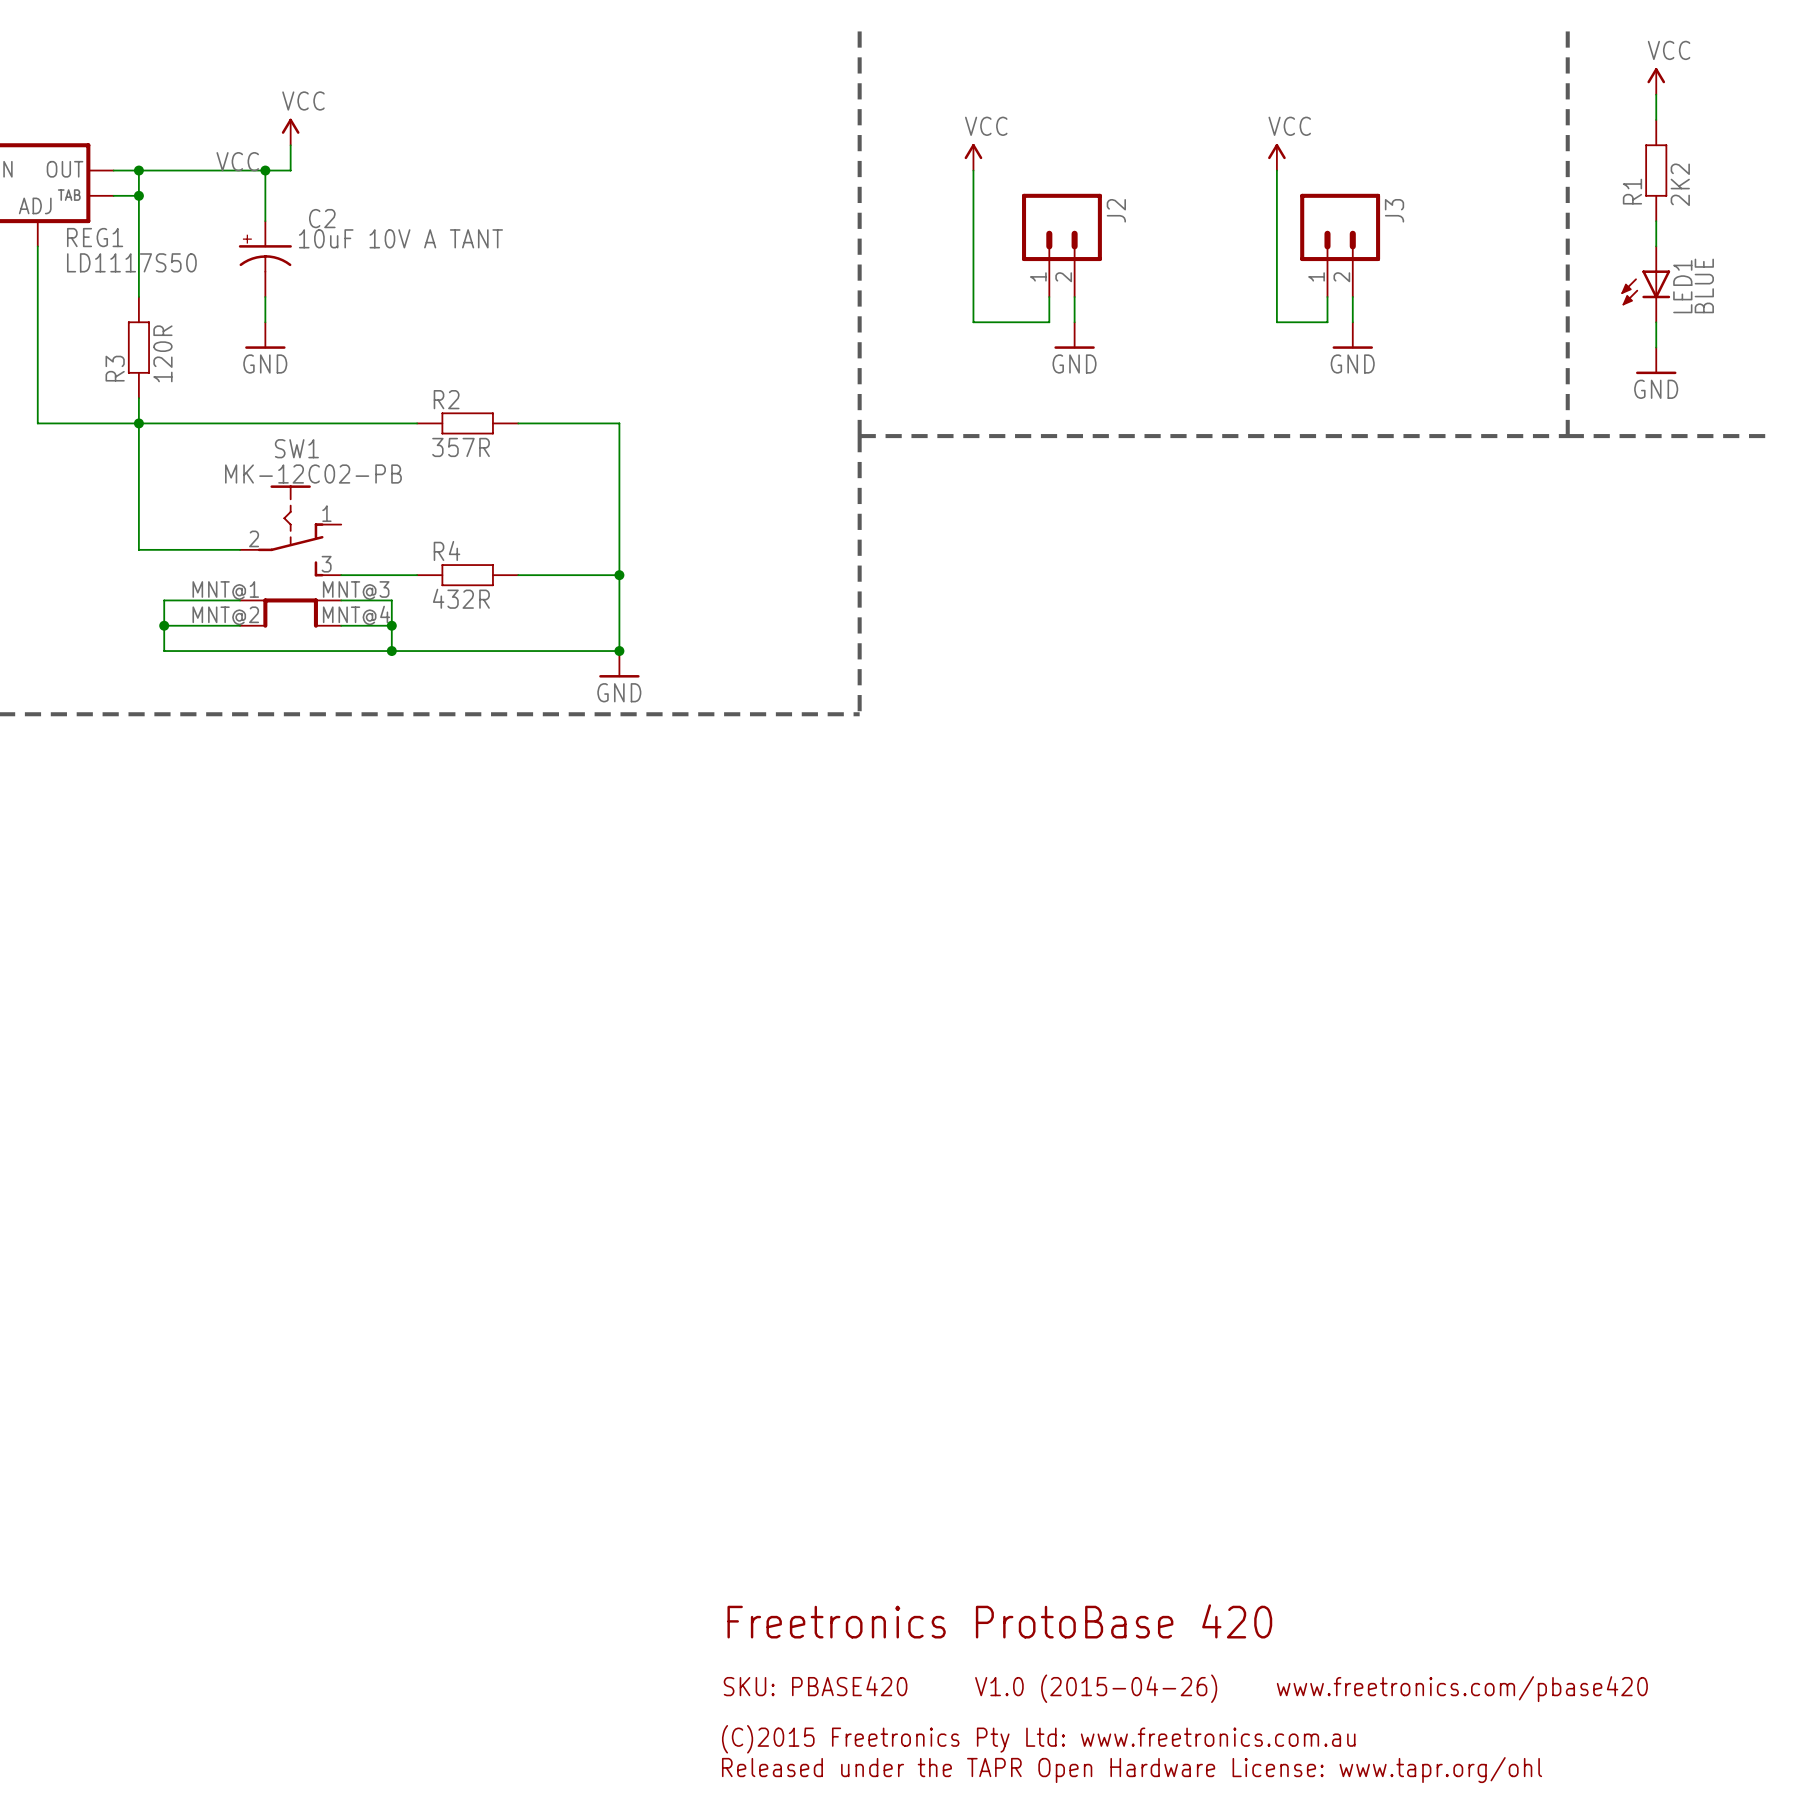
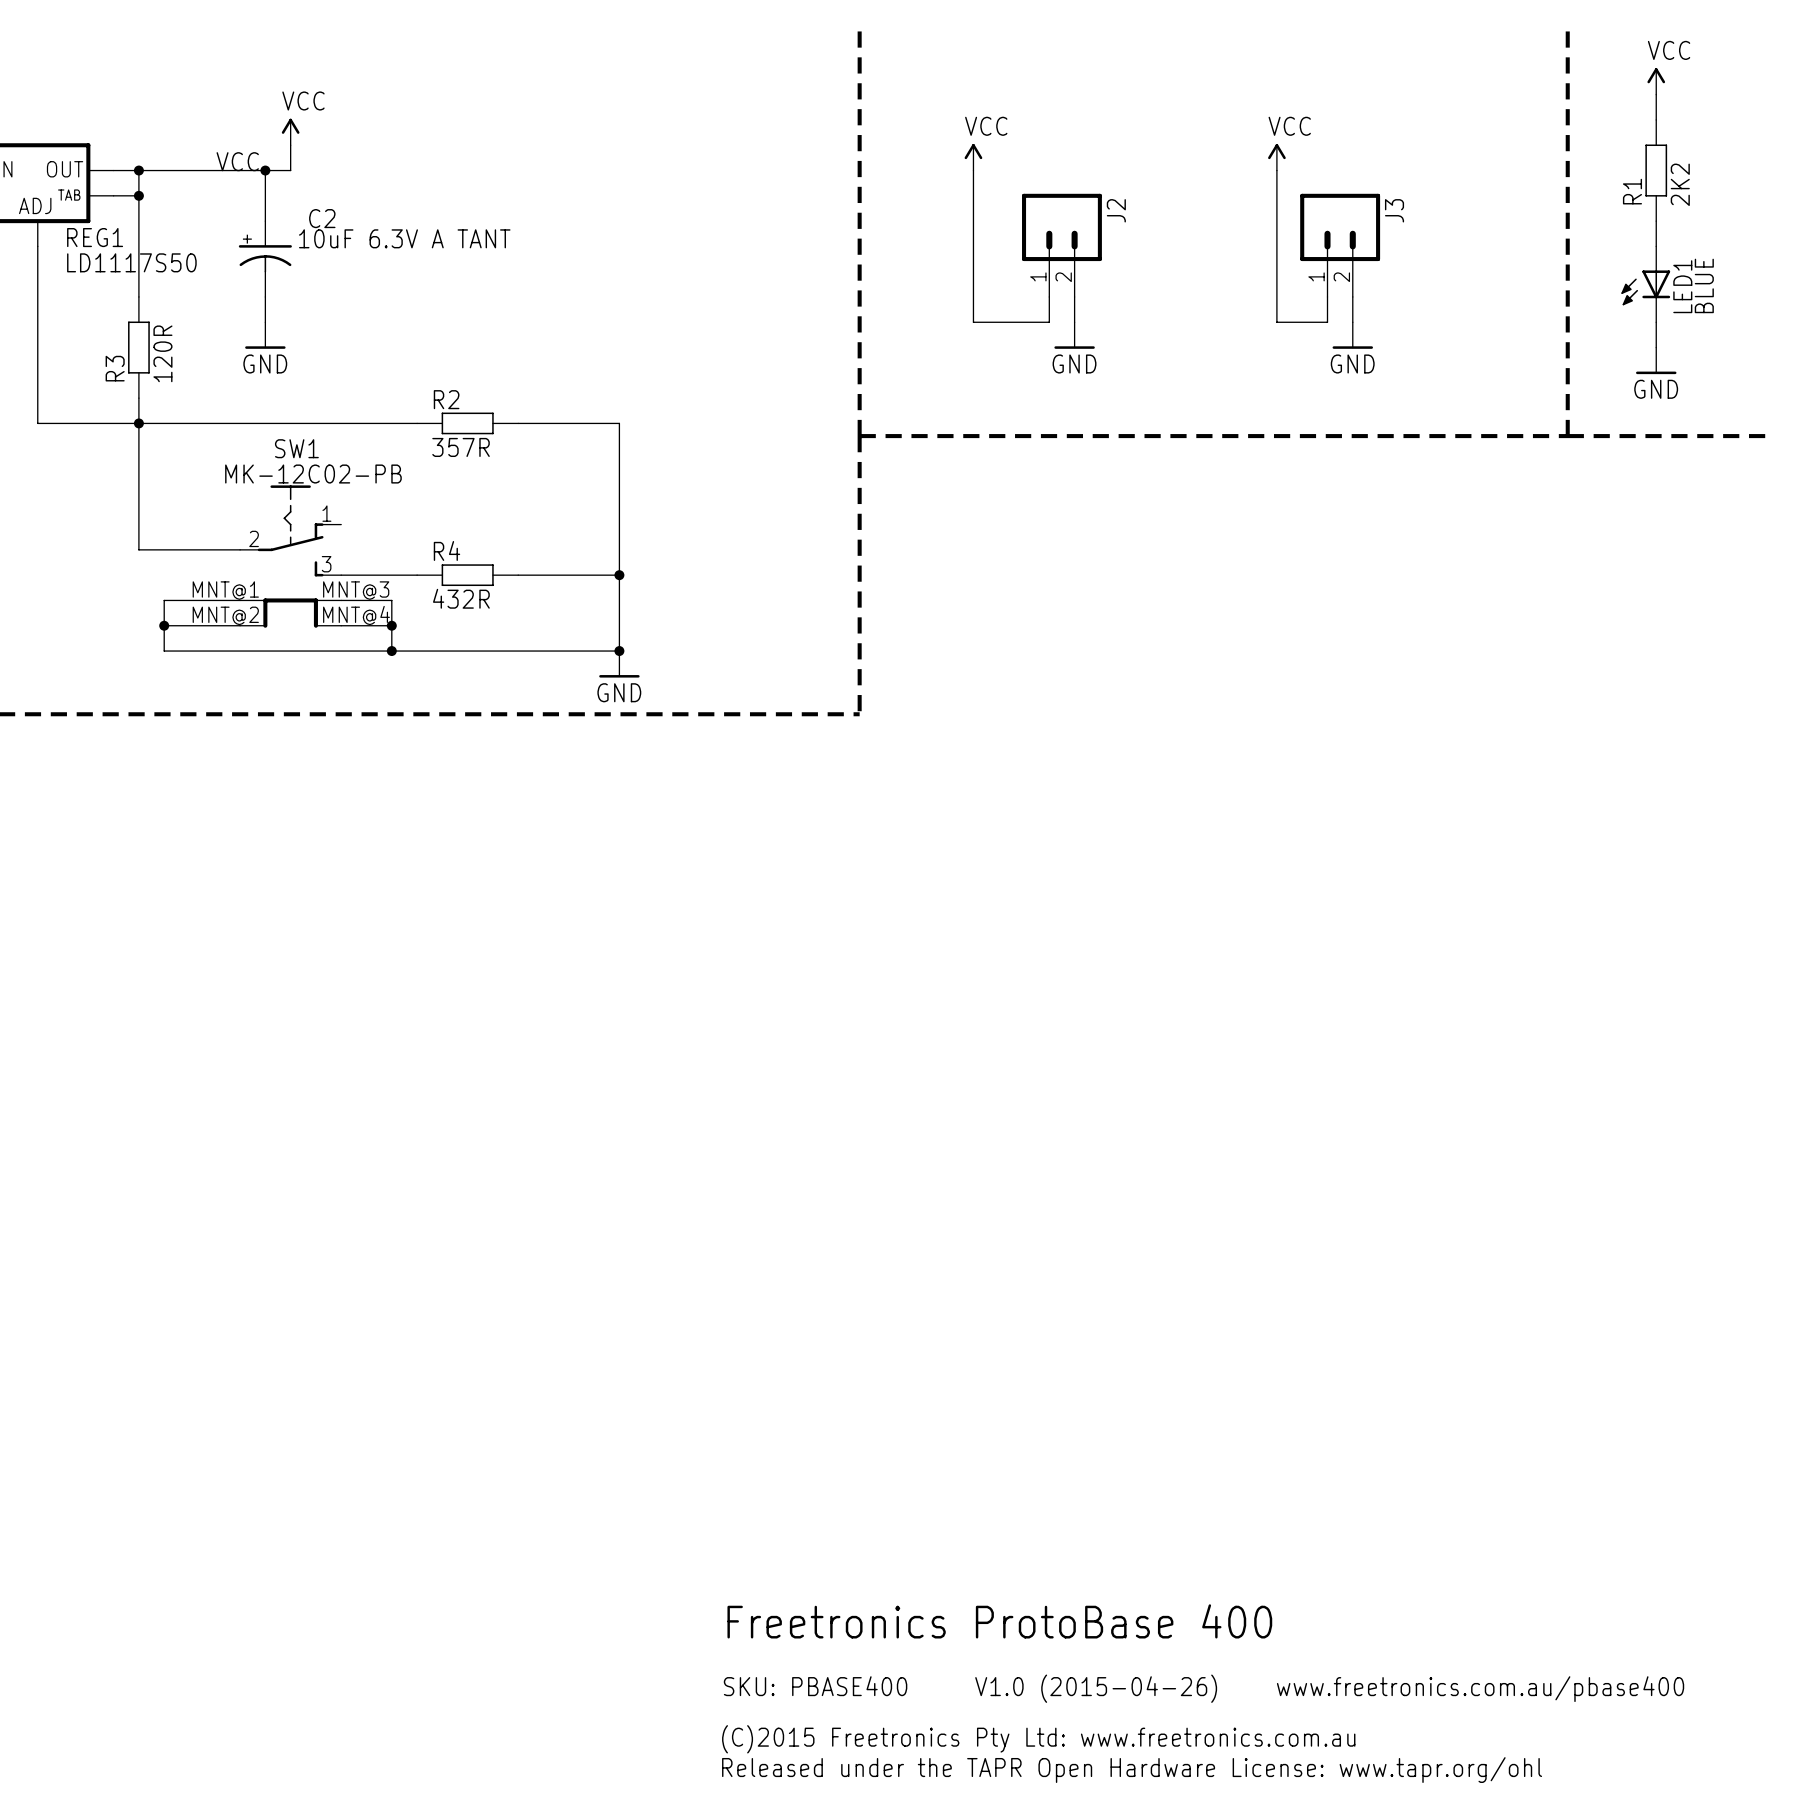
C2 value: 10uF 10V A TANT (400, 238) -> 10uF 6.3V A TANT (404, 238)
text: Freetronics ProtoBase 420 (999, 1621) -> Freetronics ProtoBase 400 (999, 1621)
text: SKU: PBASE420 (815, 1686) -> SKU: PBASE400 (815, 1686)
text: www.freetronics.com/pbase420 (1462, 1689) -> www.freetronics.com.au/pbase400 (1480, 1689)

